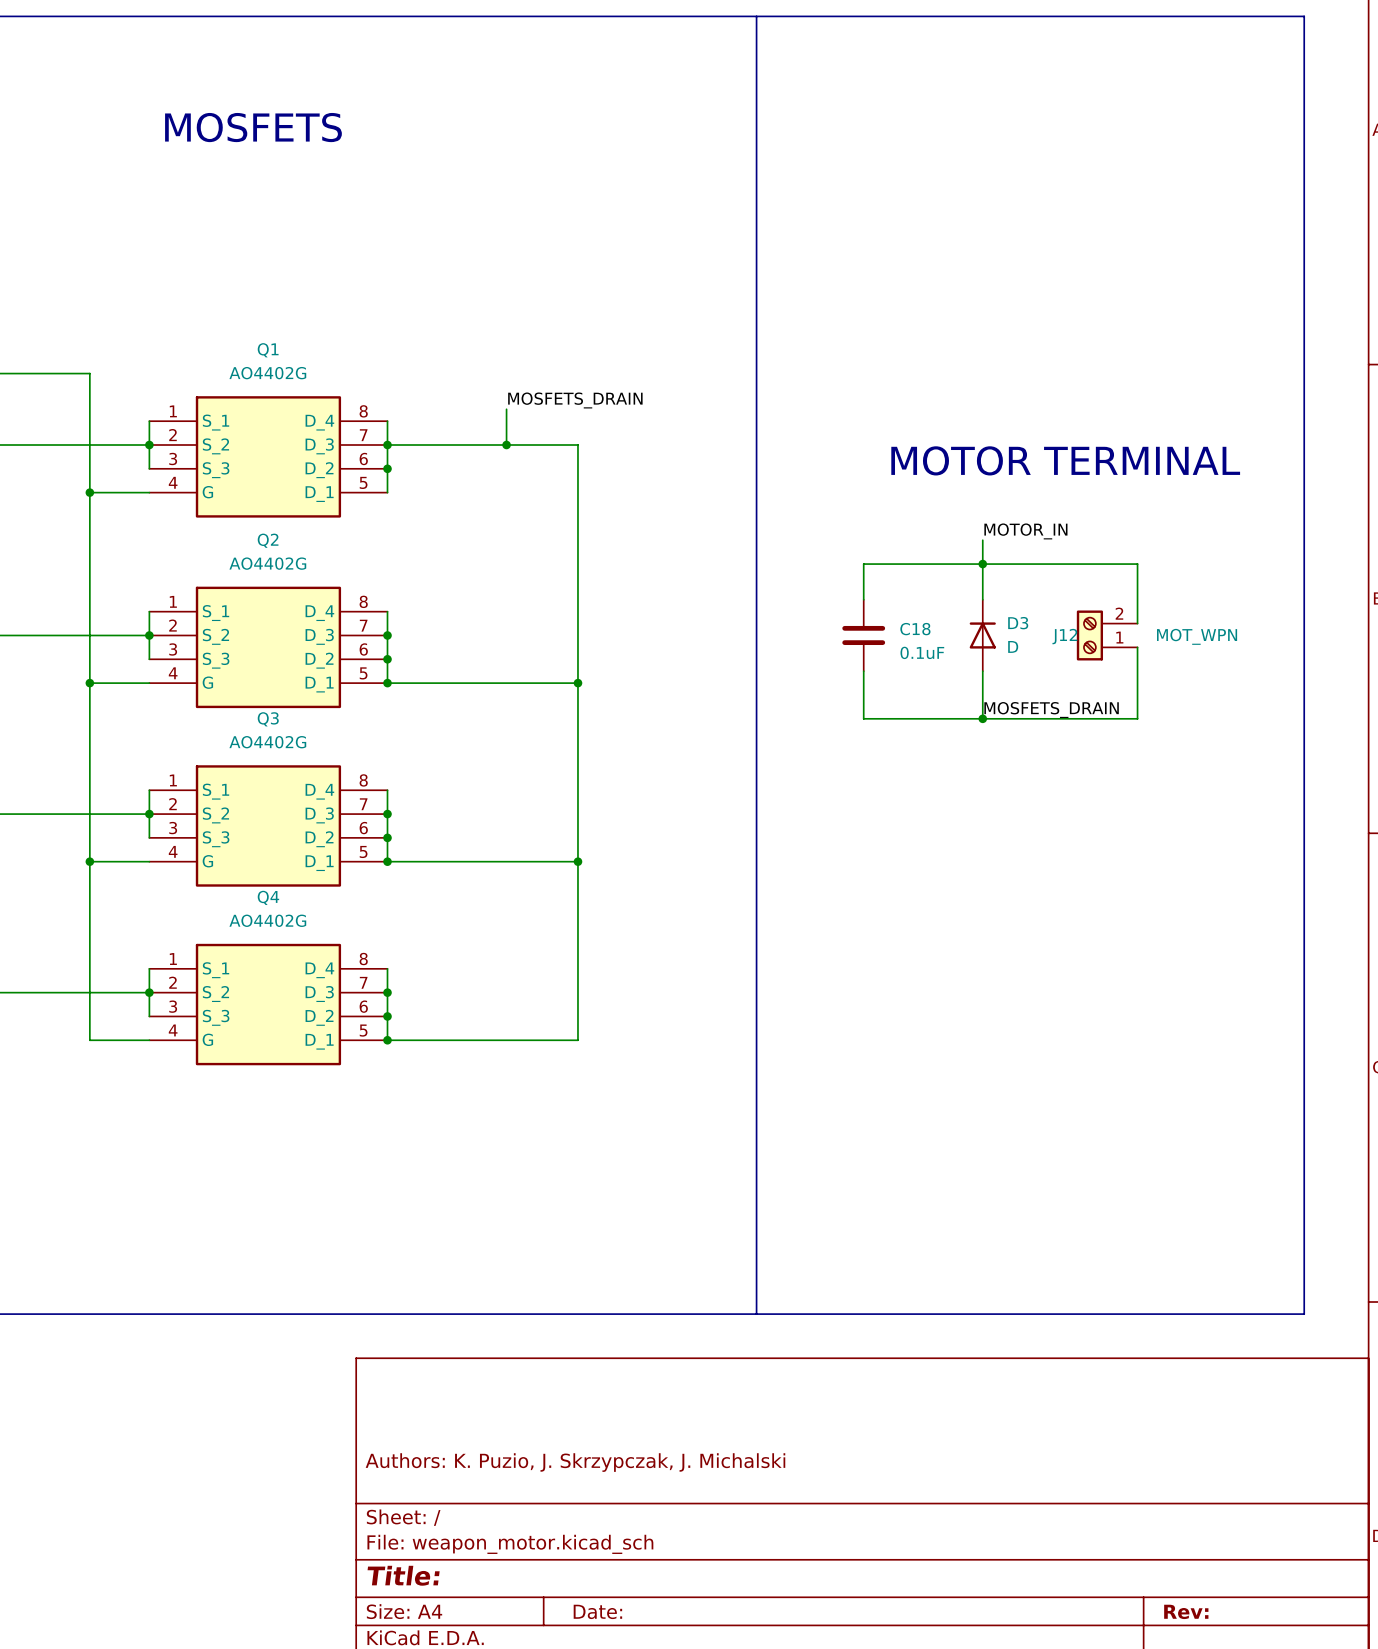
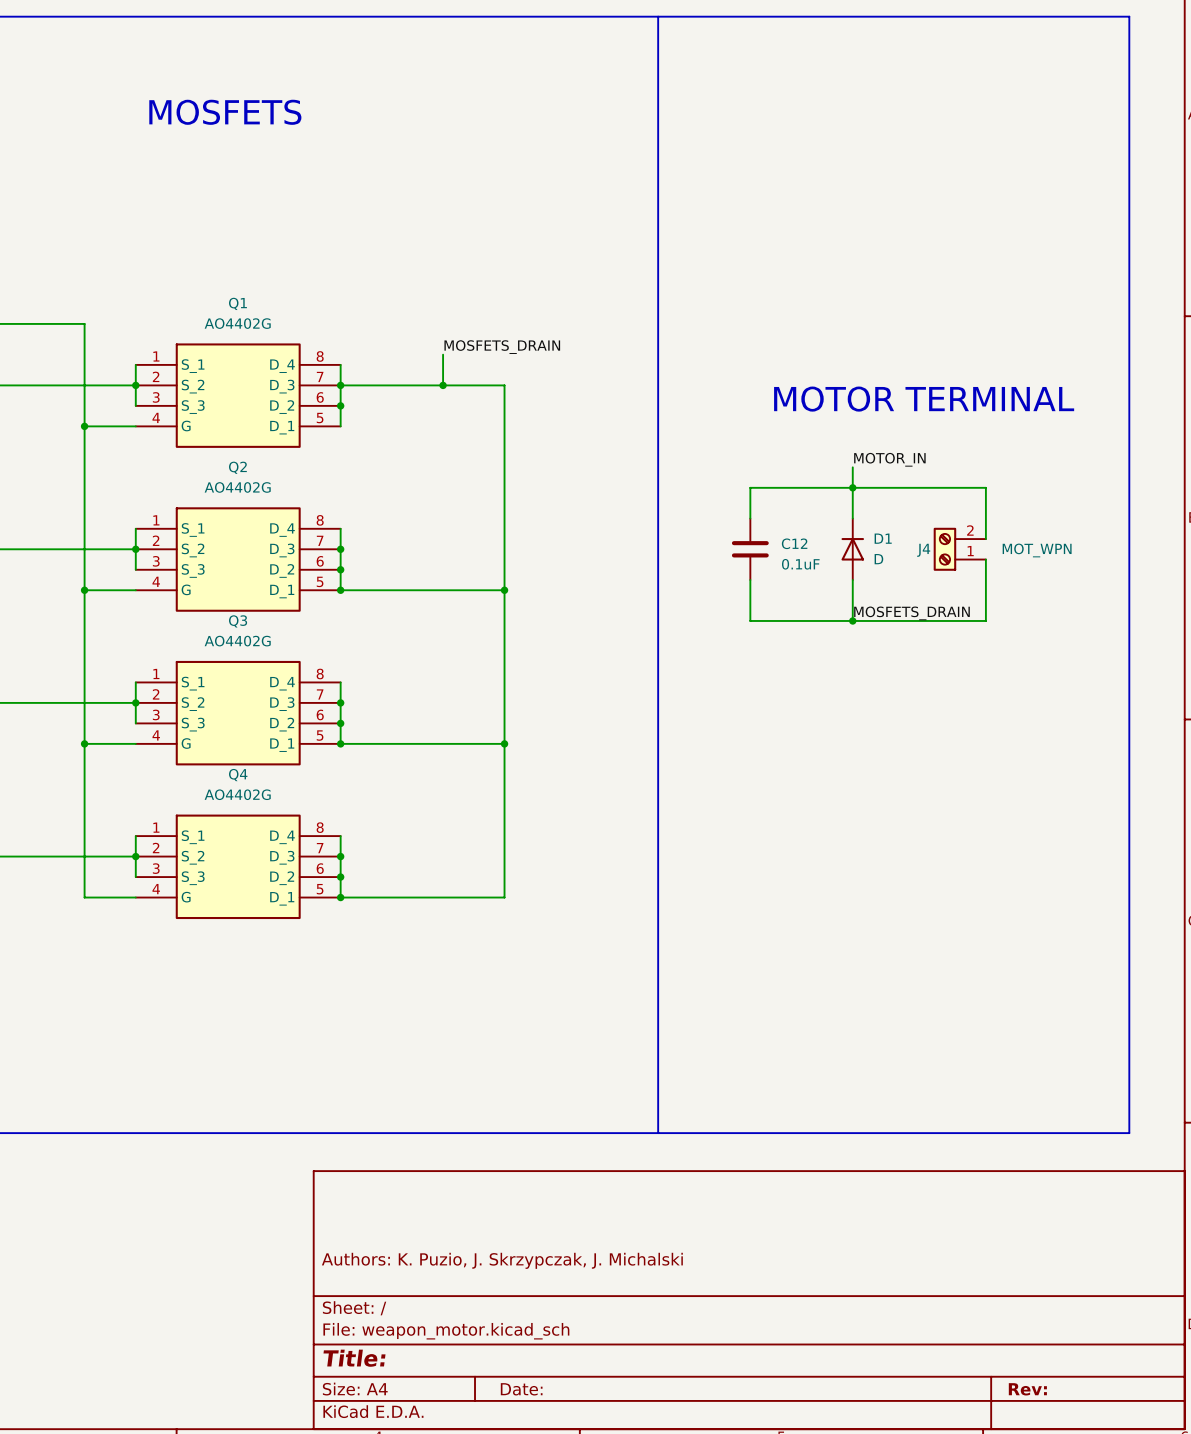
D3 name: D3 (1018, 623) -> D1 (883, 538)
C18 name: C18 (915, 629) -> C12 (794, 543)
J12 name: J12 (1064, 636) -> J4 (923, 550)

